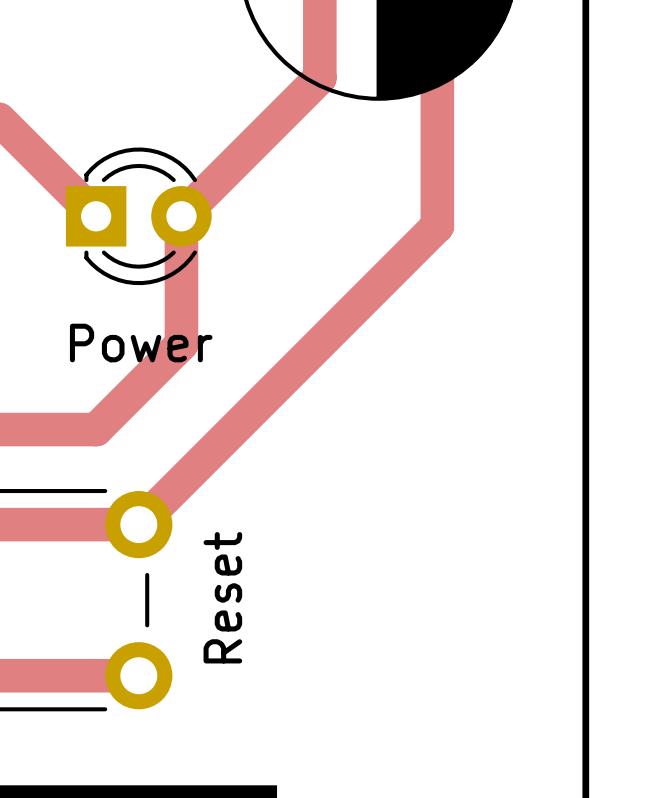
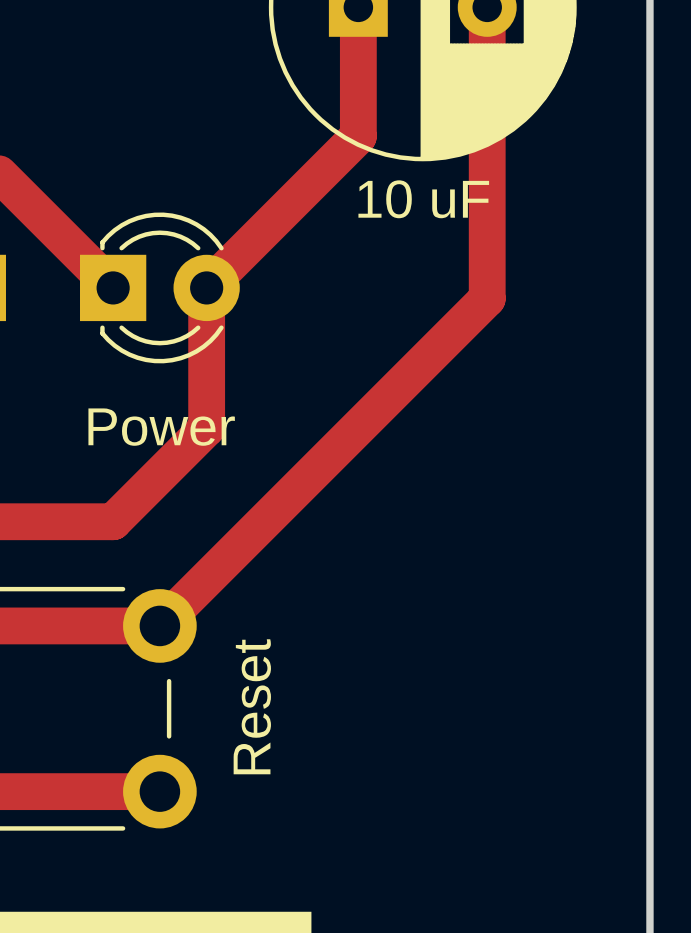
part value: none -> 10 uF (423, 199)

